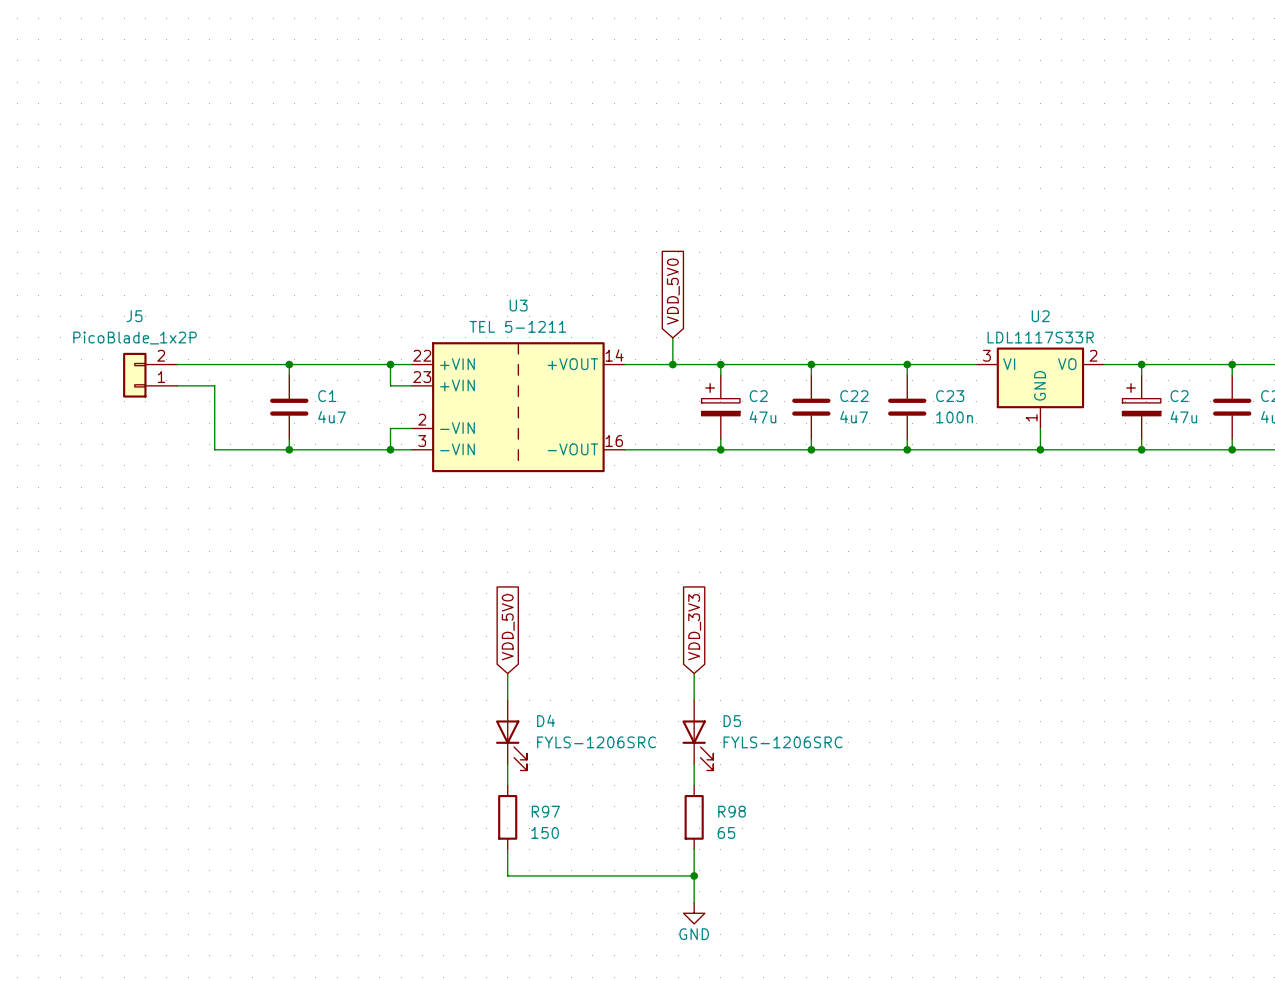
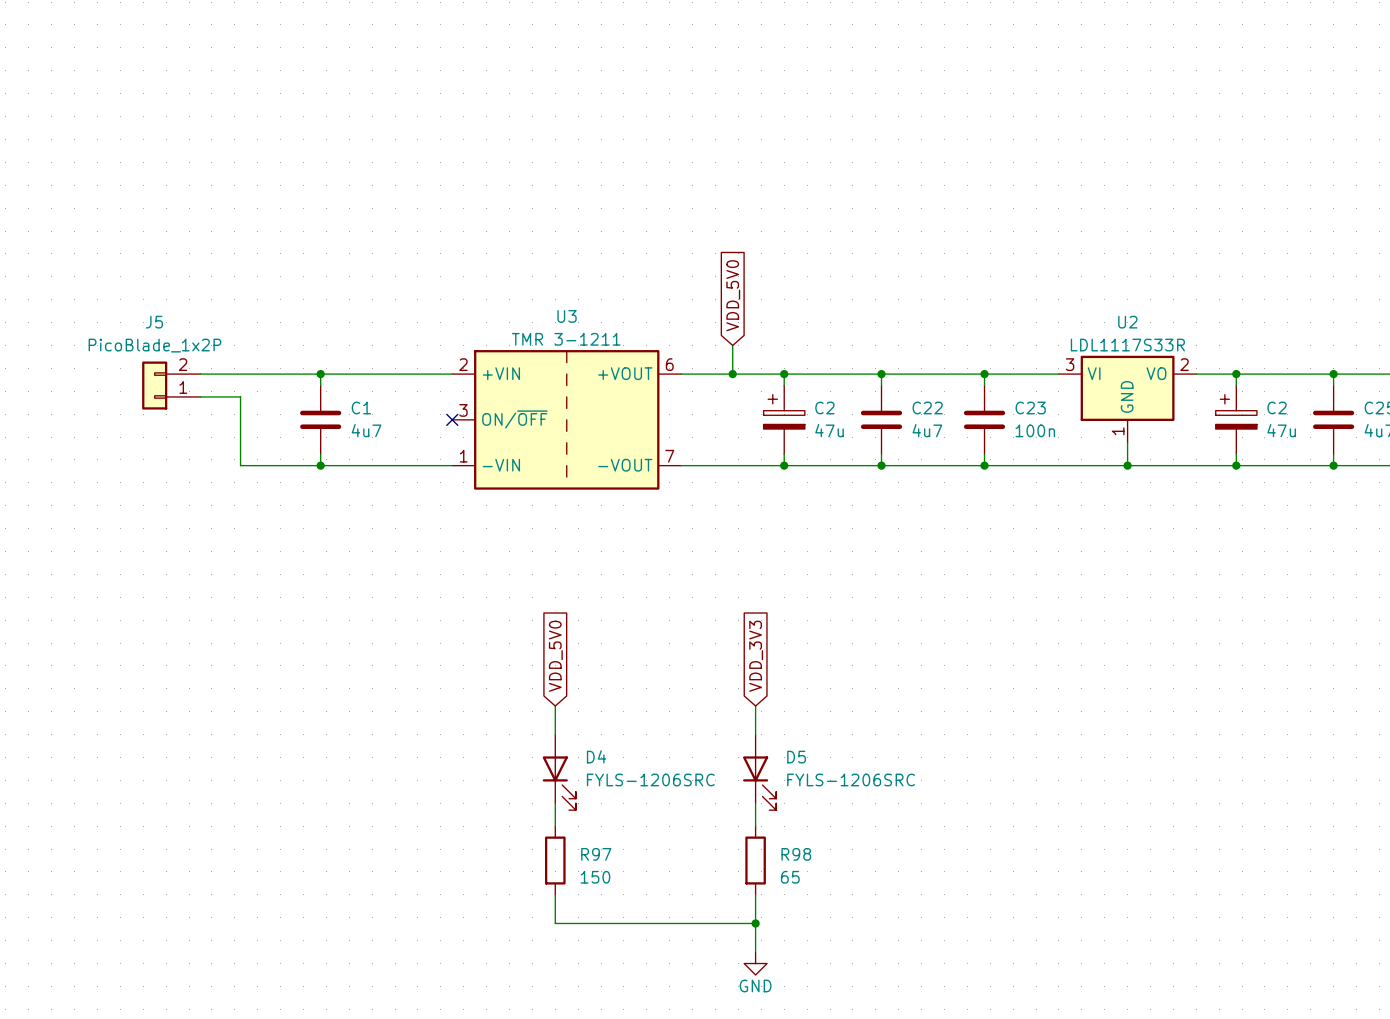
U3 value: TEL 5-1211 (517, 326) -> TMR 3-1211 (566, 339)
U3 symbol: [411, 342, 625, 473] -> [452, 350, 682, 490]
wire: (390, 364) (390, 385) (411, 385) -> none
junction: (390, 364) -> none
no-connect mark: none -> (452, 419)
wire: (411, 428) (390, 428) (390, 449) -> none
junction: (390, 449) -> none

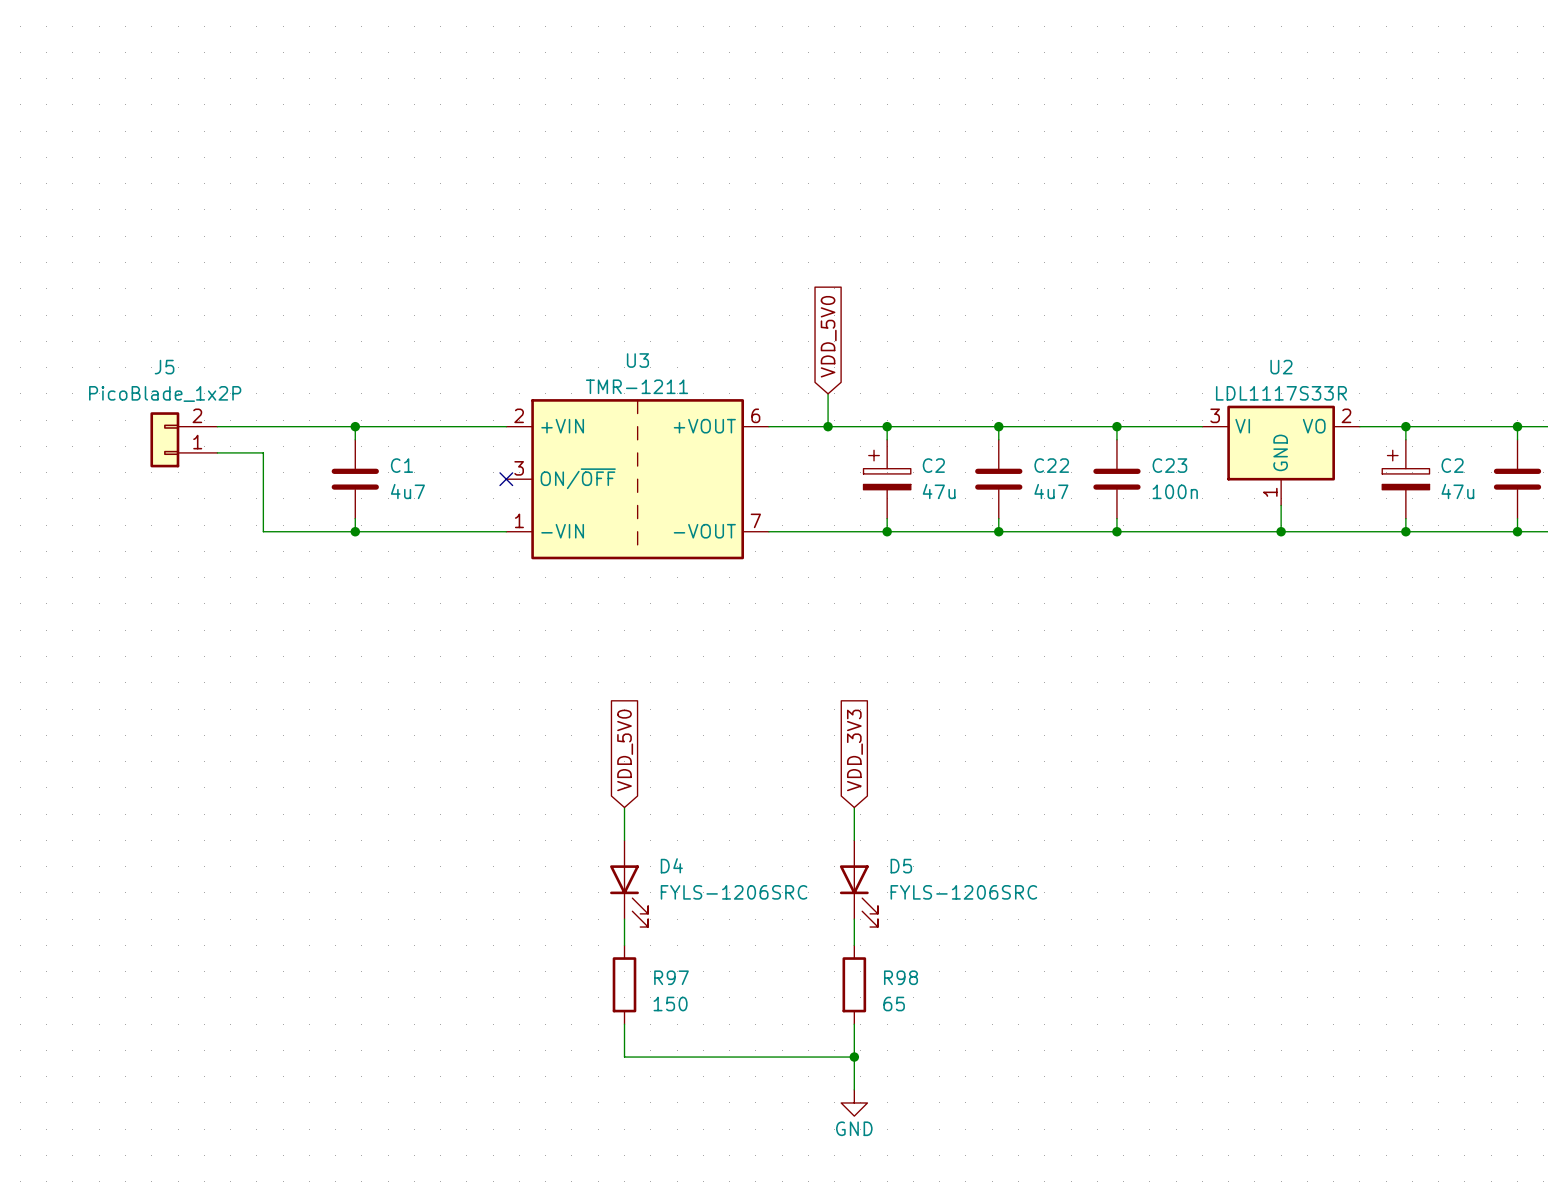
U3 value: TMR 3-1211 (566, 339) -> TMR-1211 (637, 386)

